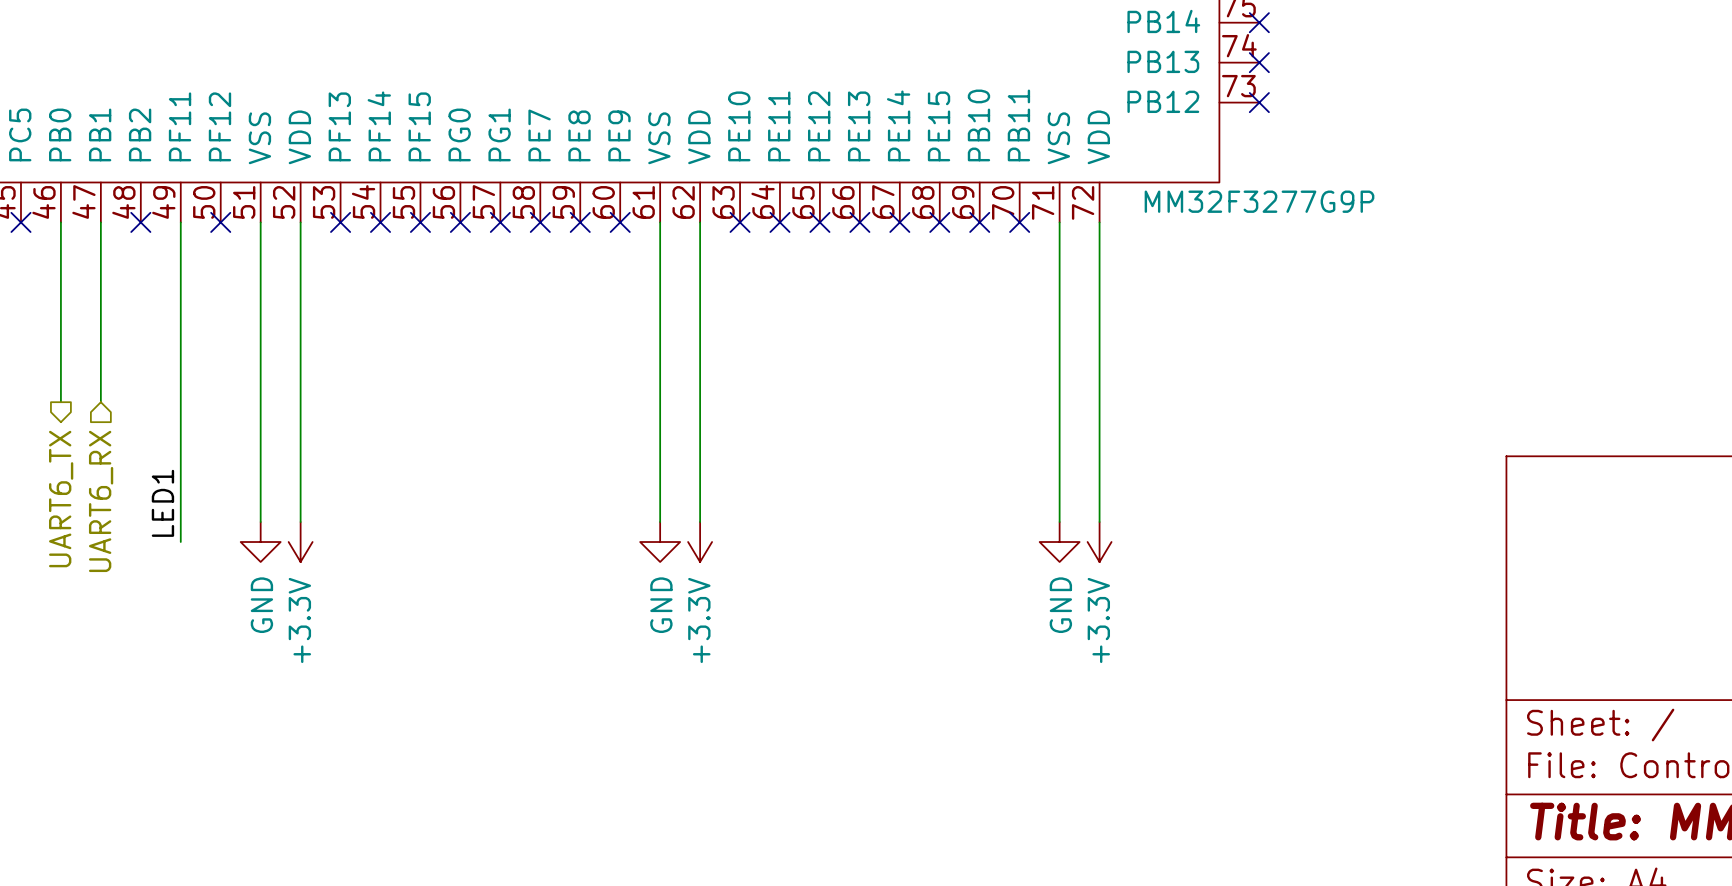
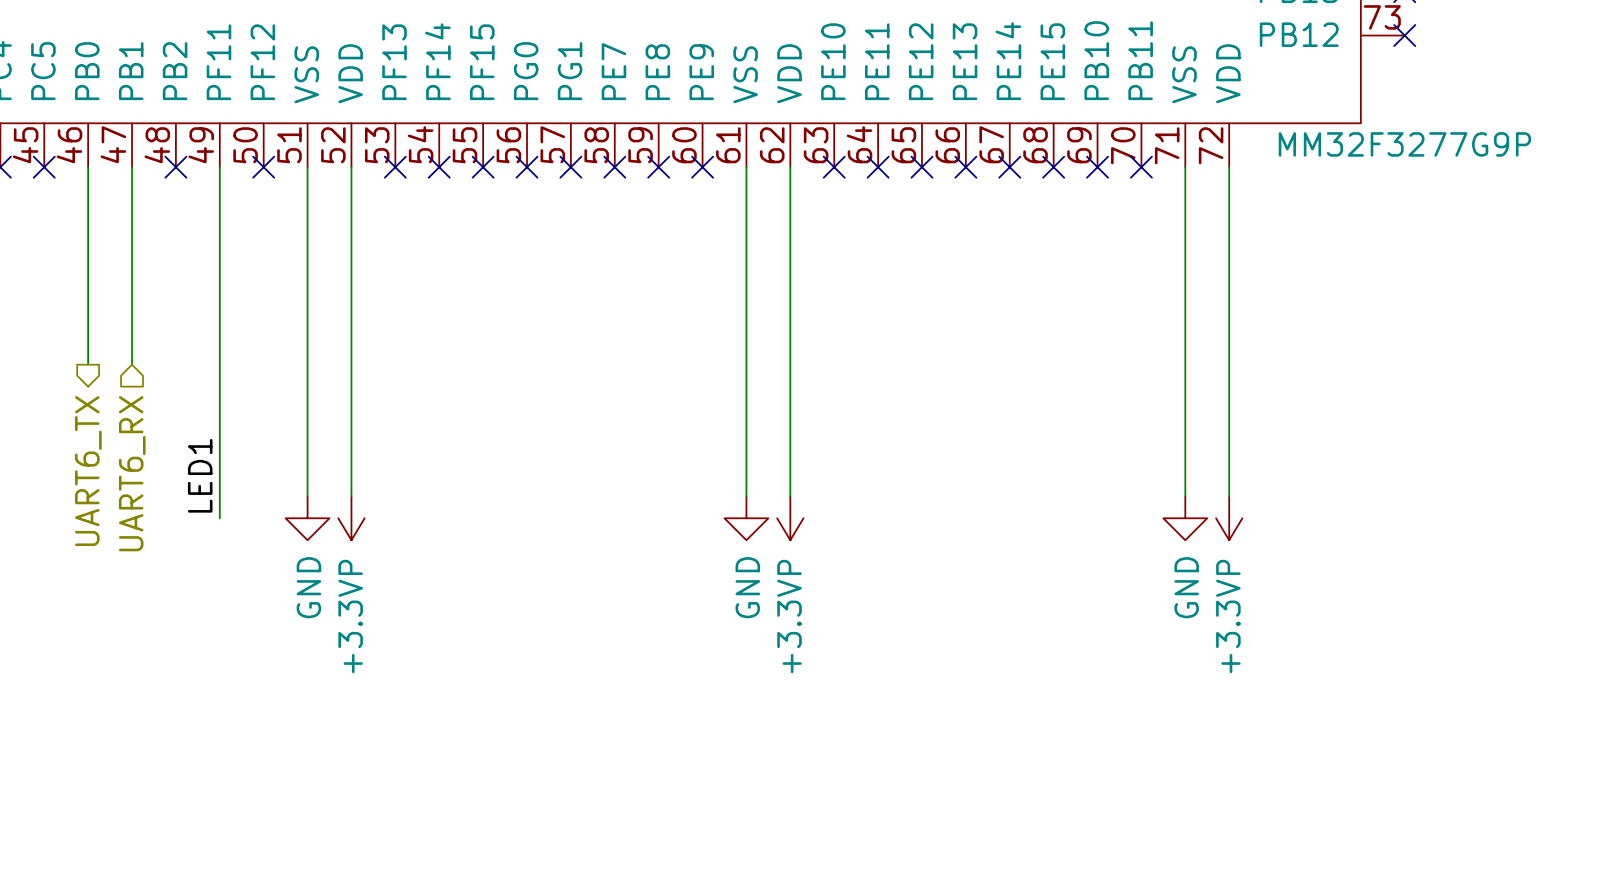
power symbol: +3.3V (300, 542) -> +3.3VP (351, 518)
power symbol: +3.3V (700, 542) -> +3.3VP (790, 518)
power symbol: +3.3V (1099, 542) -> +3.3VP (1229, 518)

